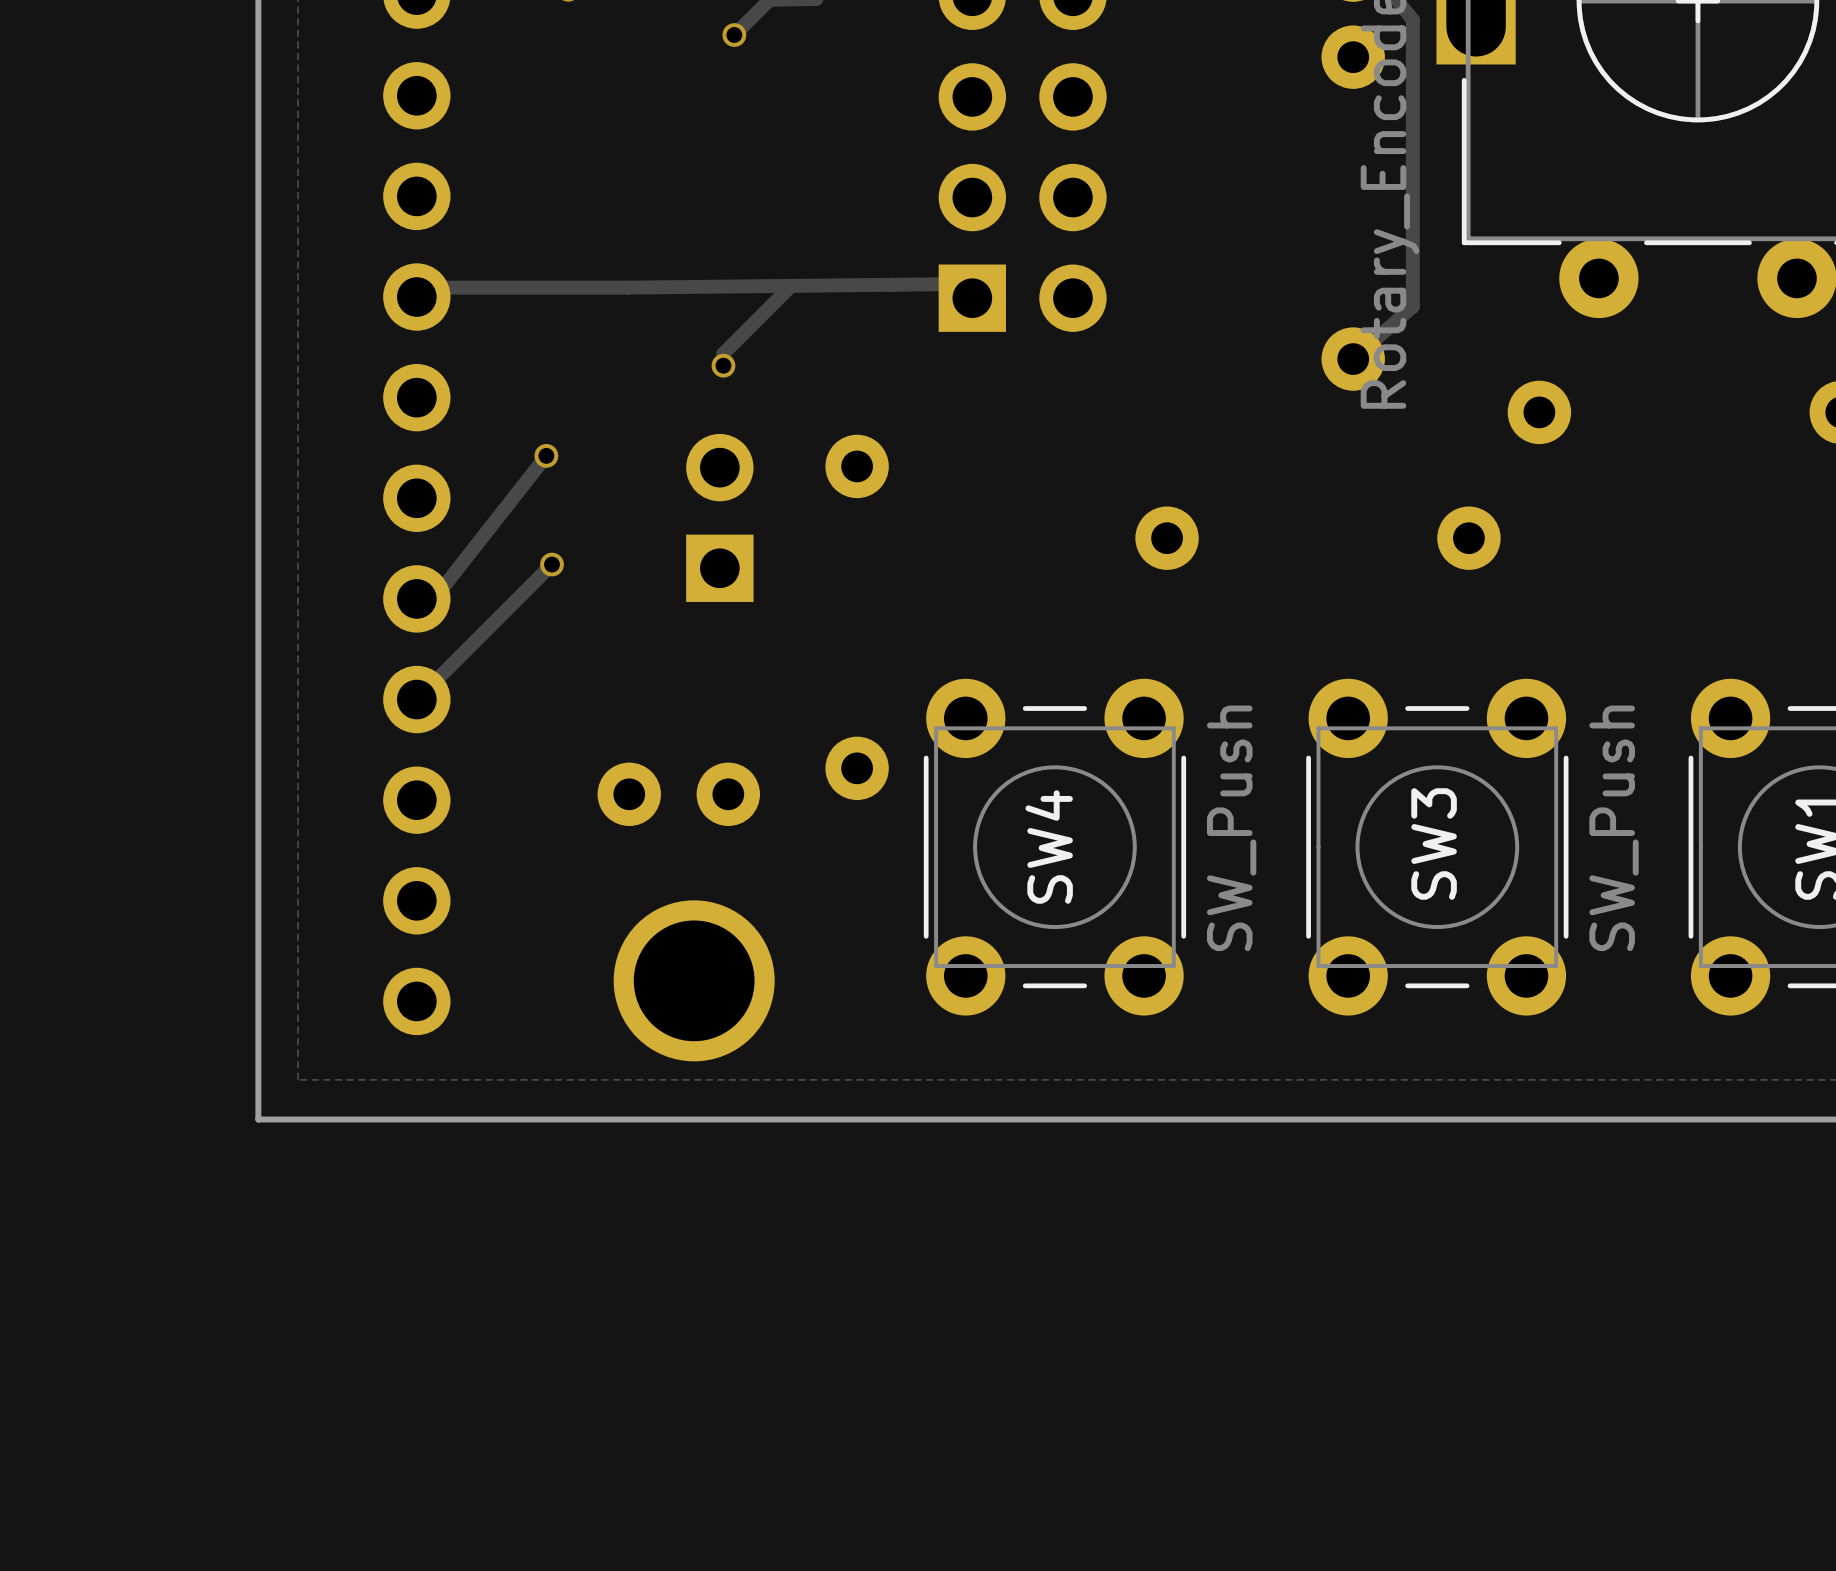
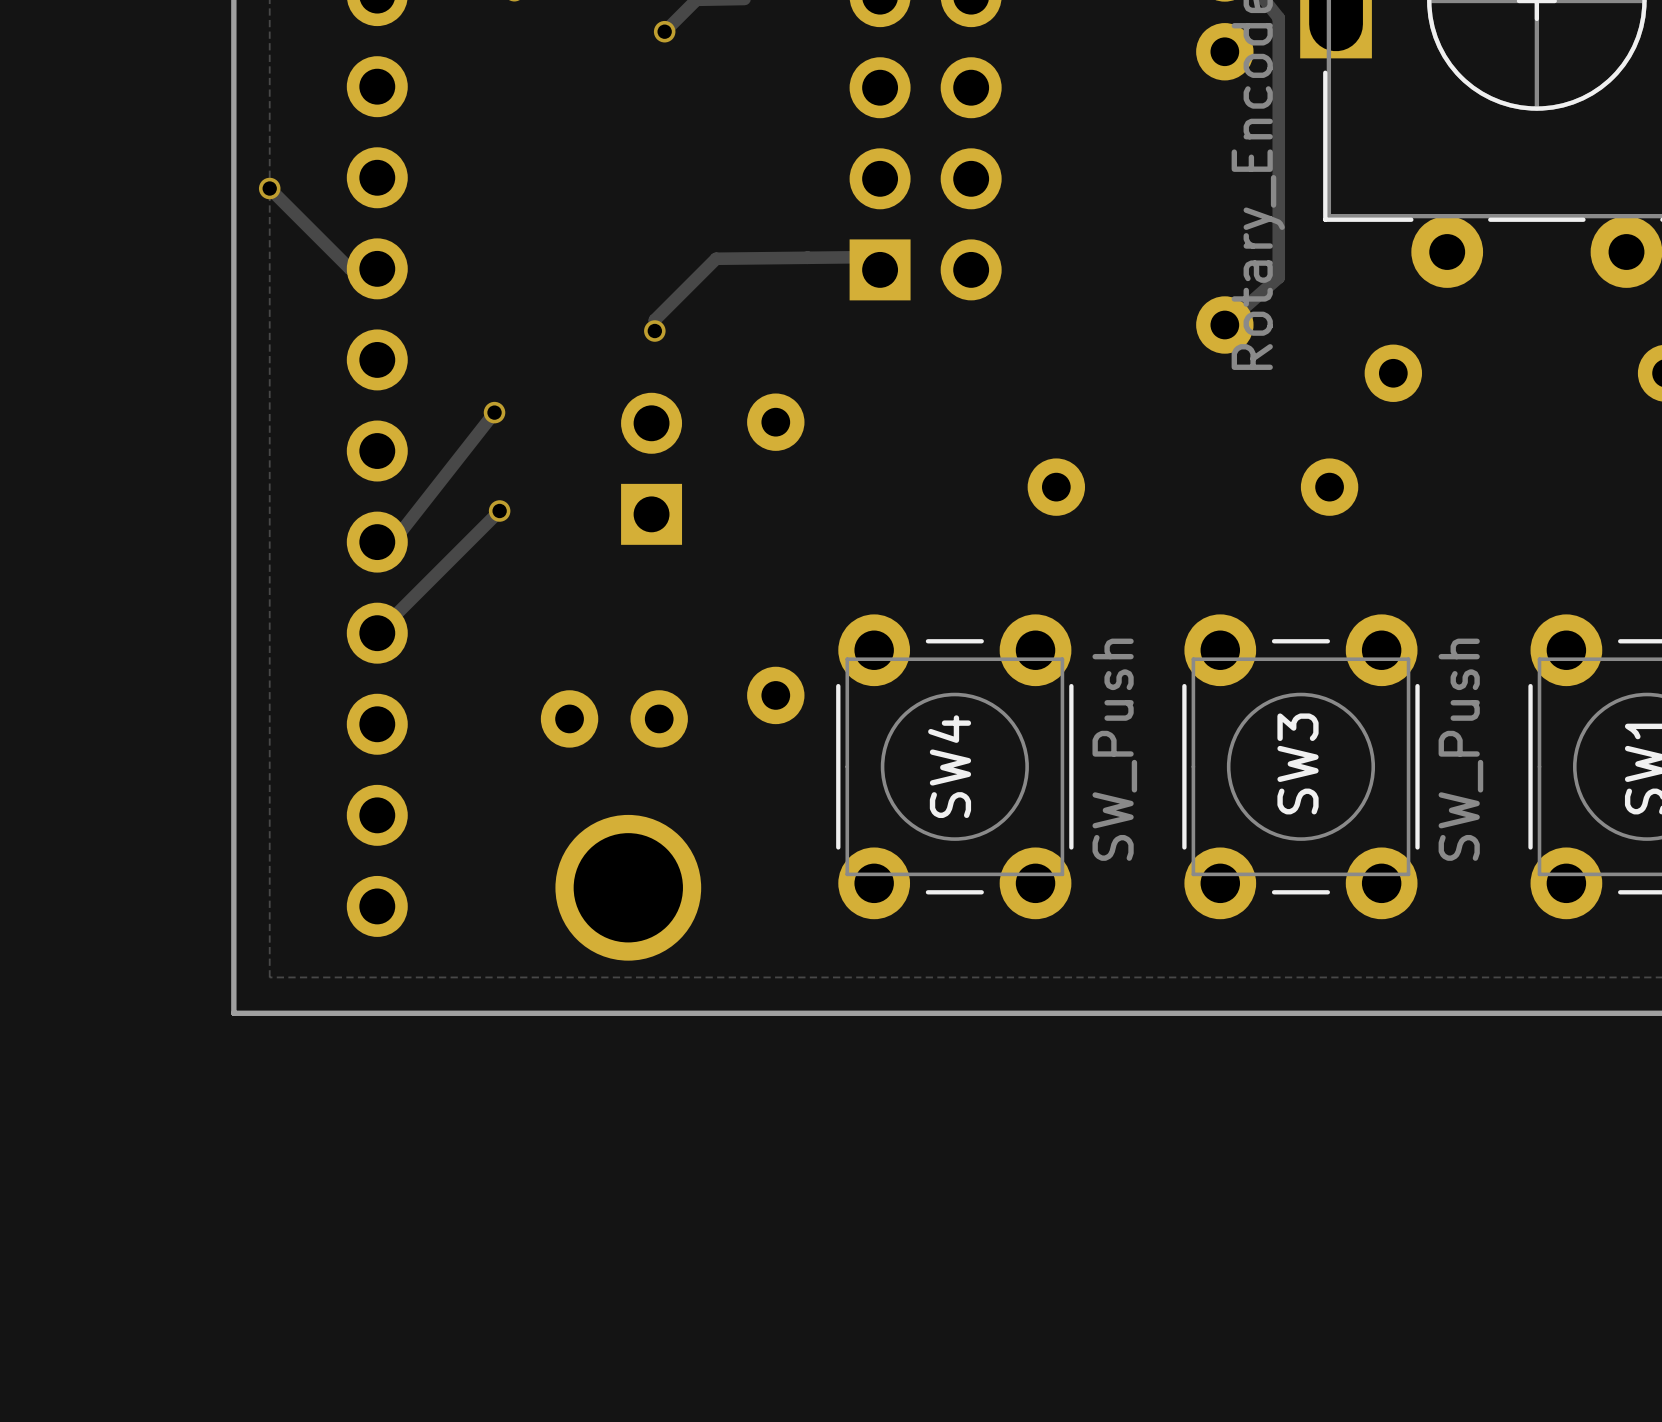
track: none -> (269, 188) (350, 268) (377, 268)
via: none -> (269, 188)
track: (791, 285) (399, 287) -> none

